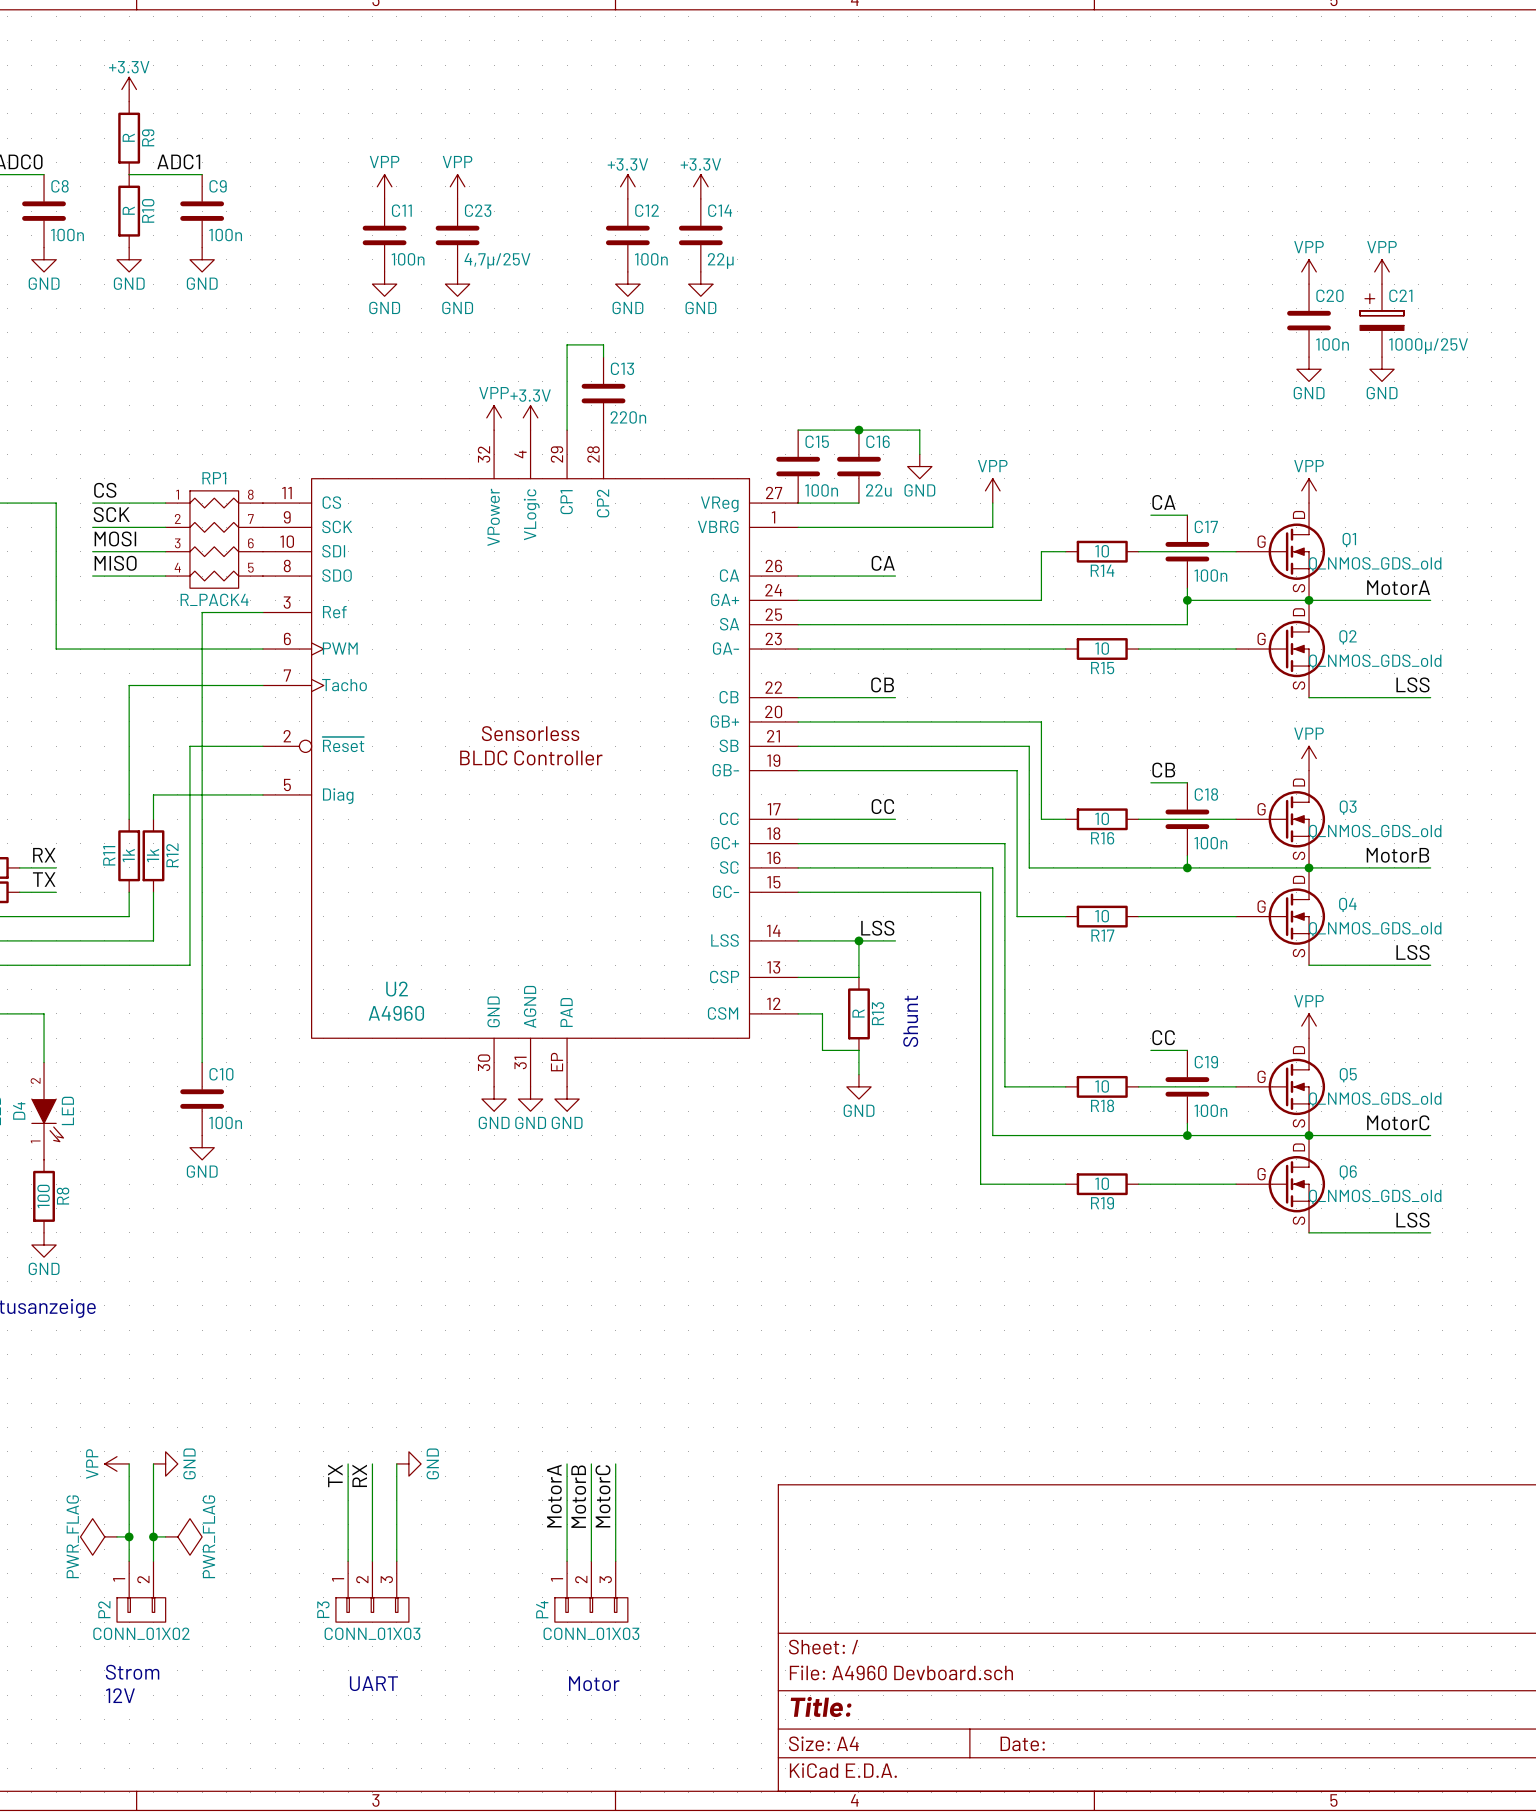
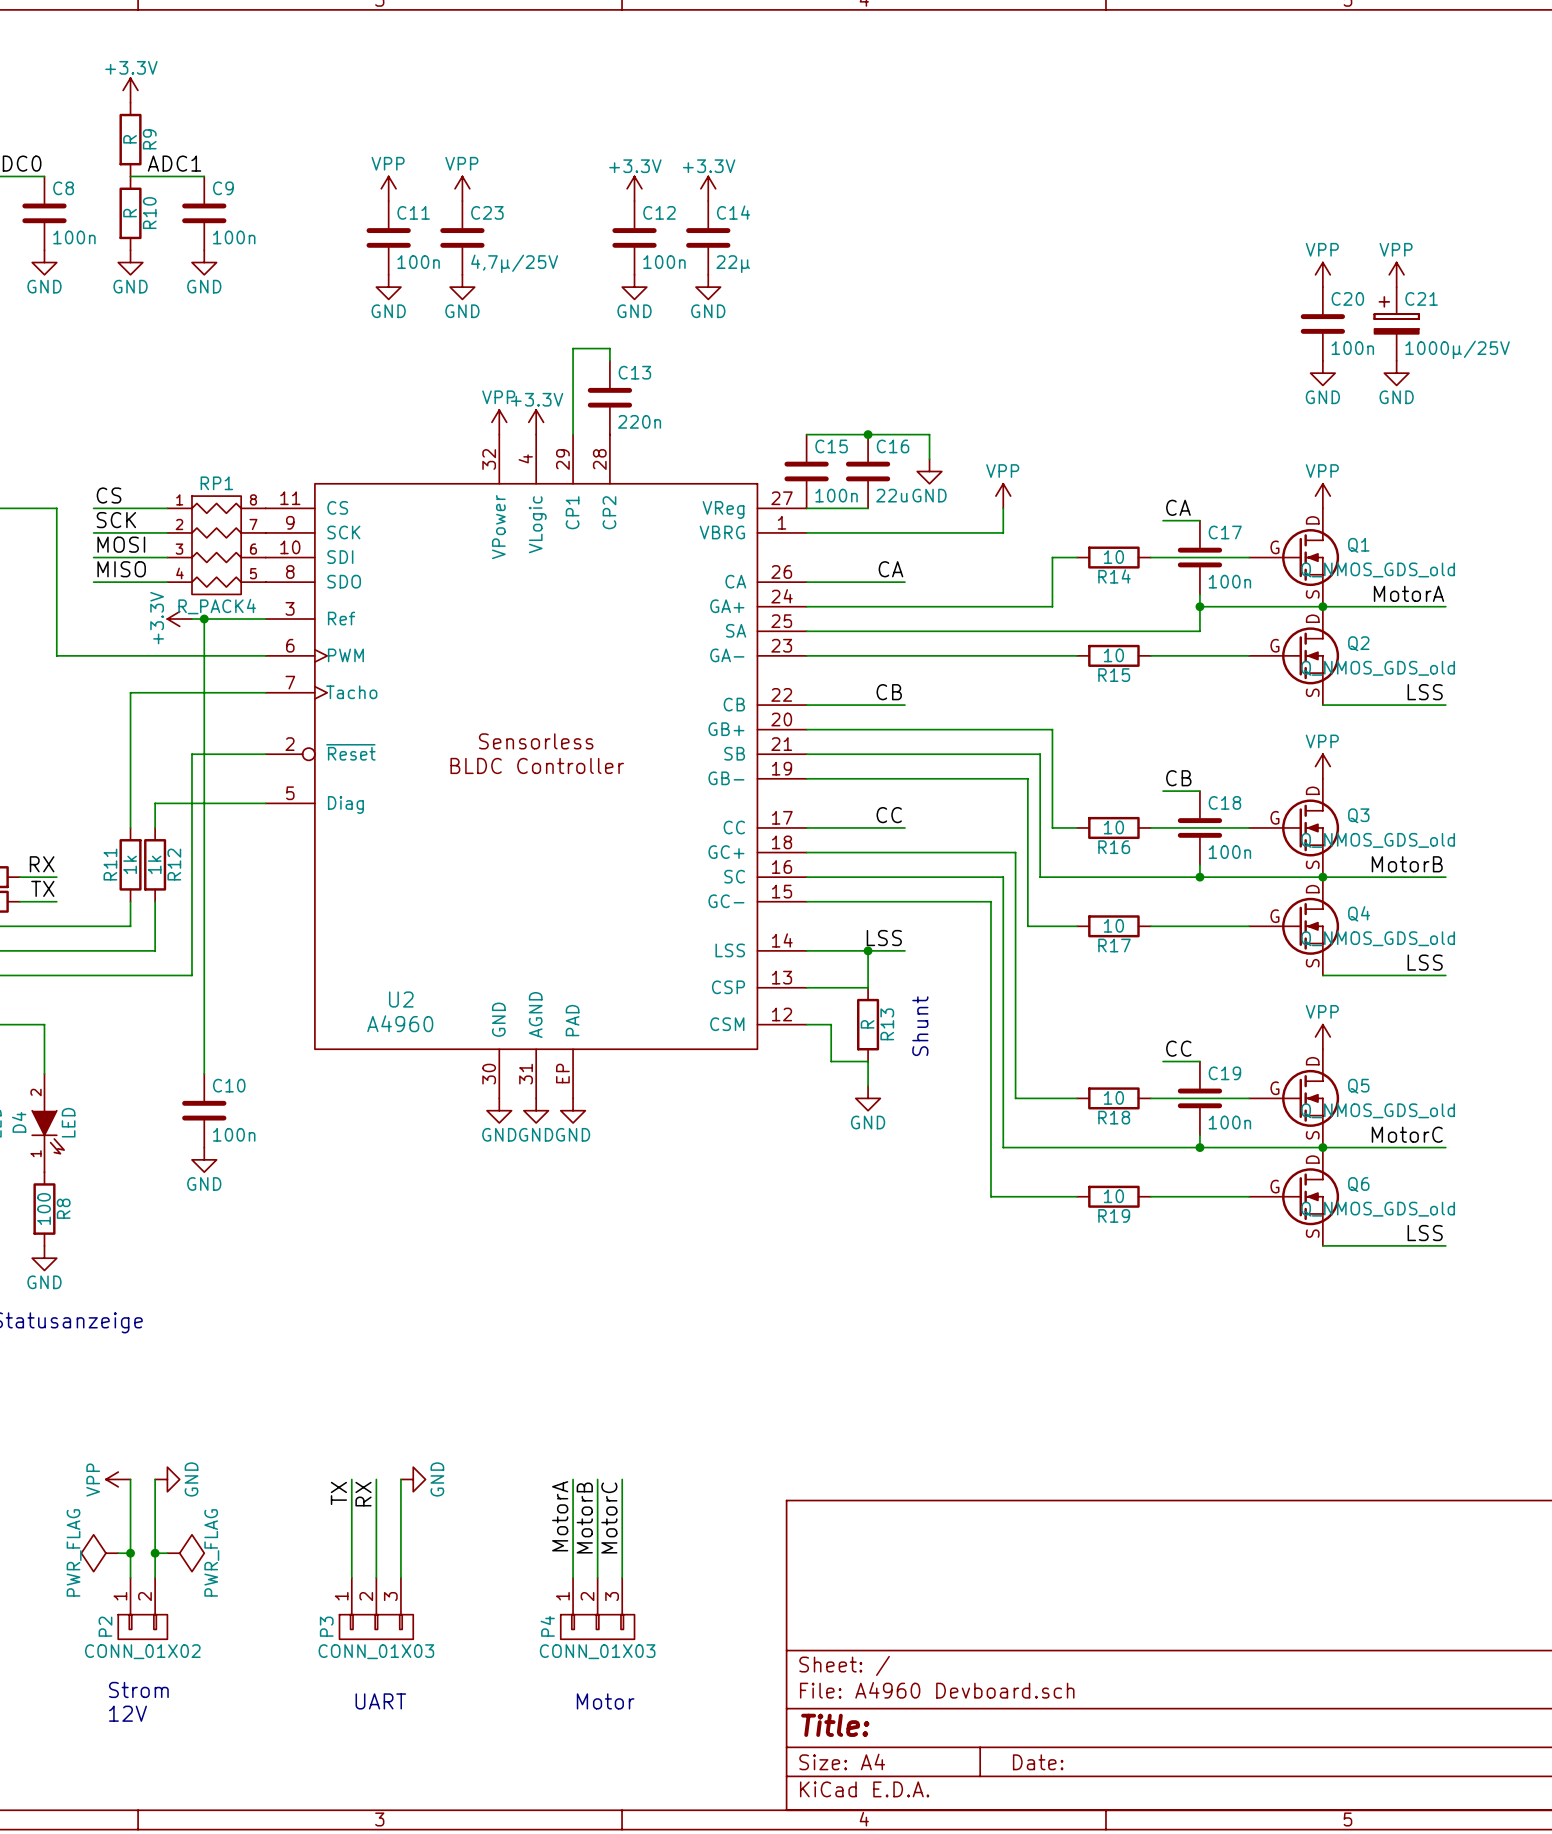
power symbol: none -> +3.3V (179, 619)
wire: none -> (191, 619) (204, 619)
junction: none -> (204, 619)

